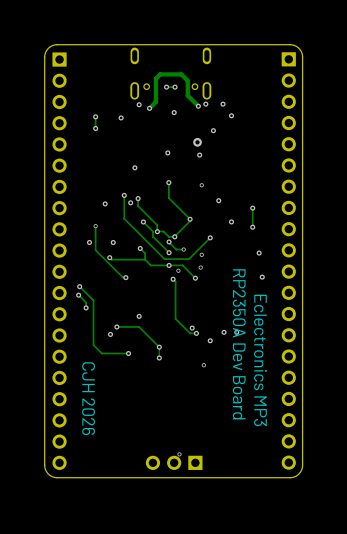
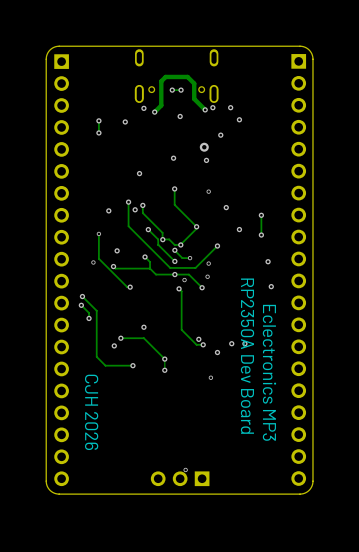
via: (89, 242) -> none
via: none -> (93, 262)

